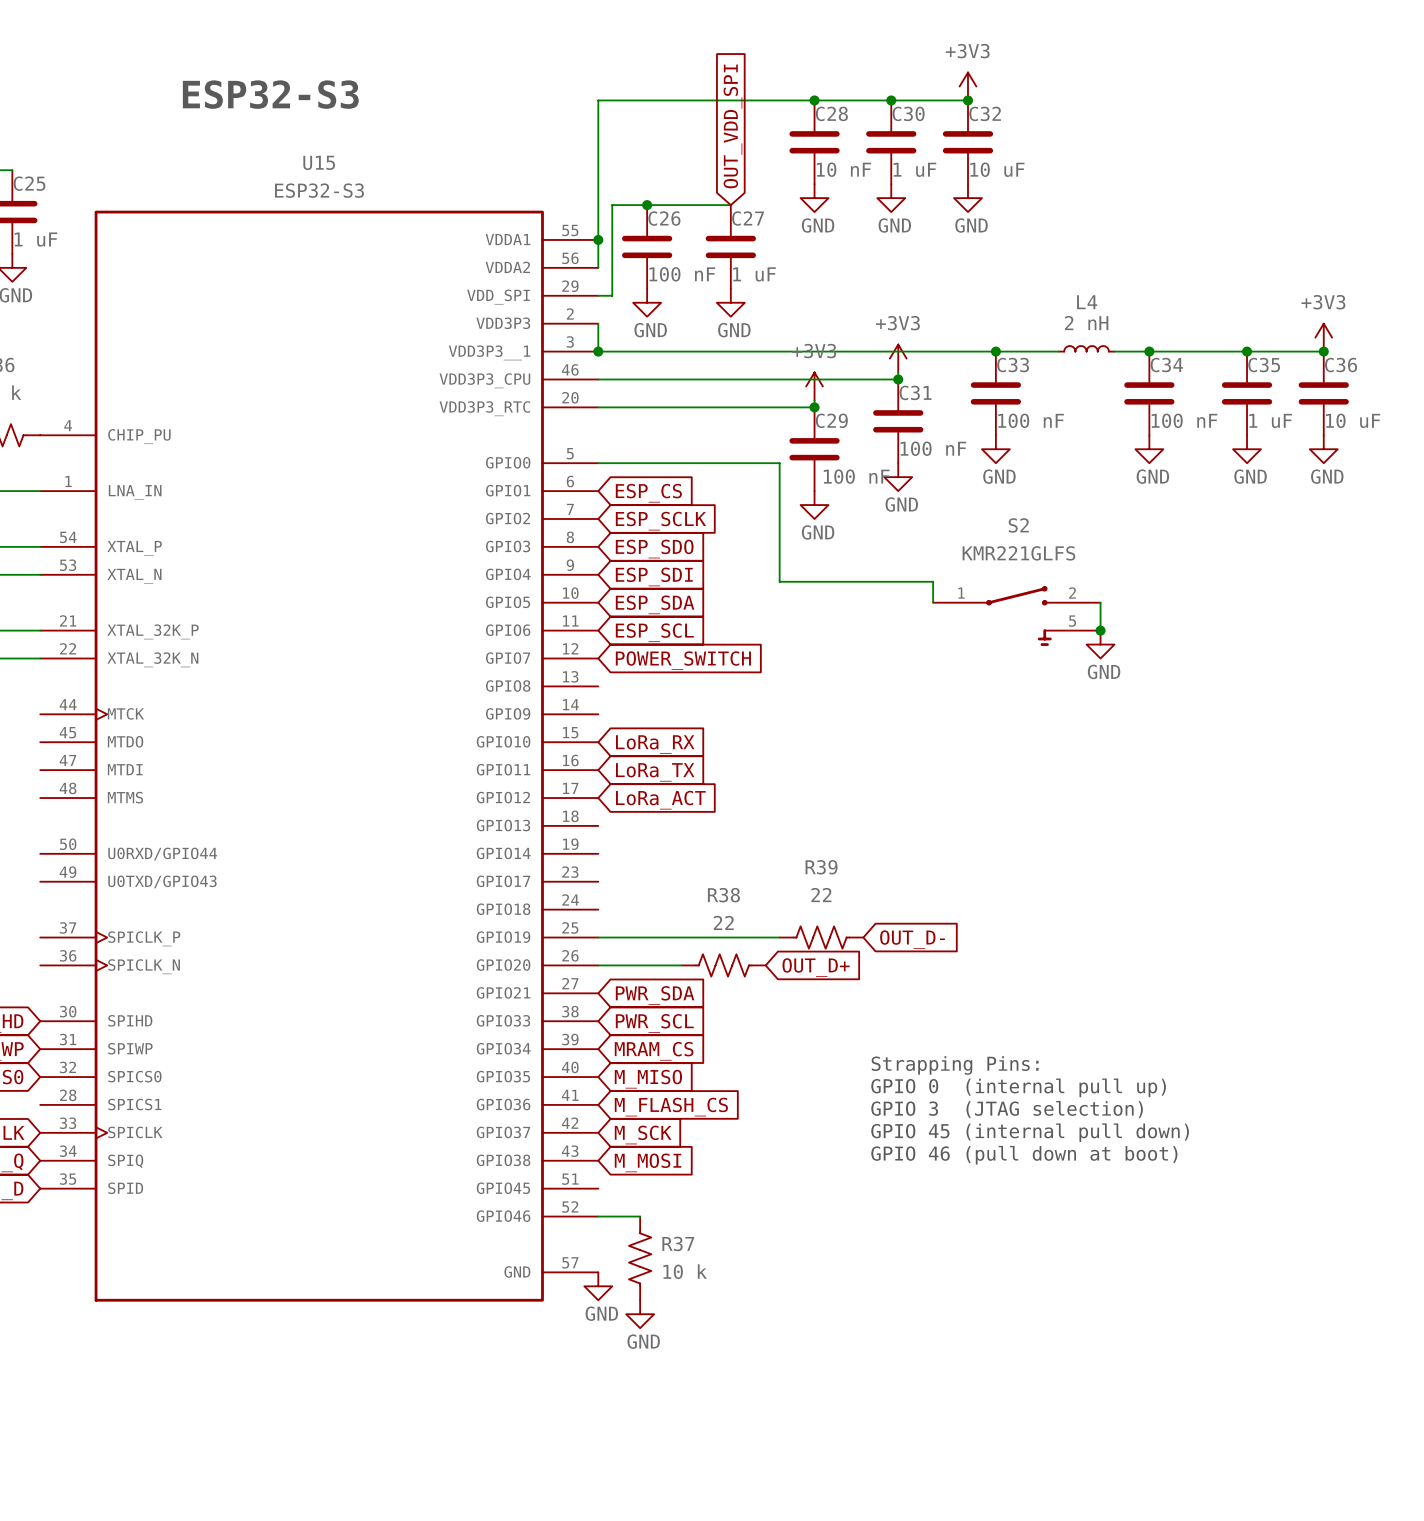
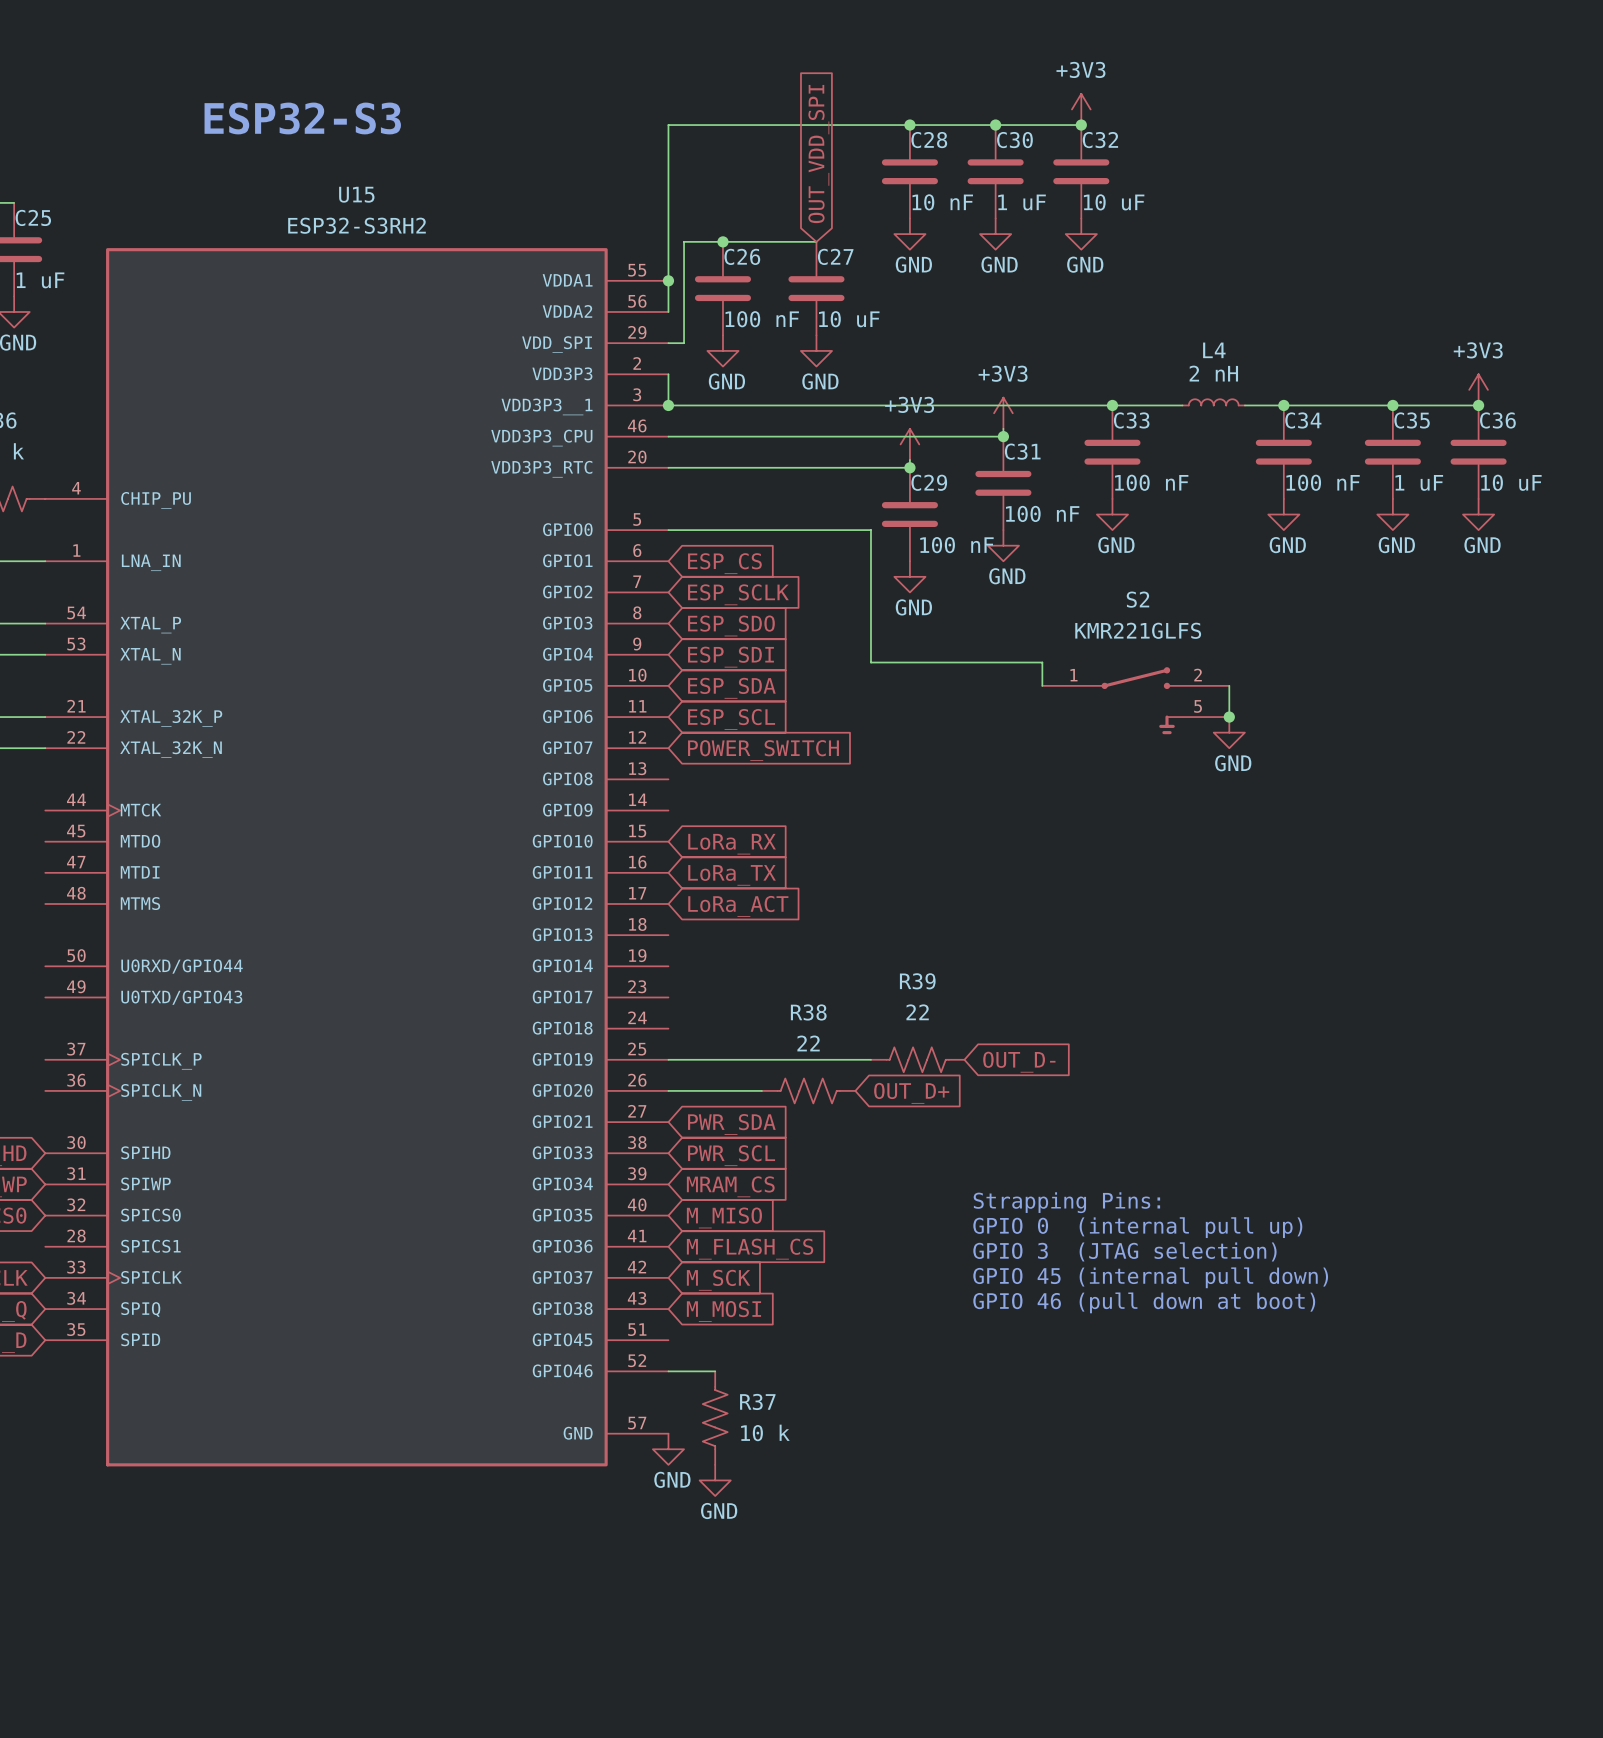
U15 value: ESP32-S3 (319, 190) -> ESP32-S3RH2 (356, 225)
C27 value: 1 uF (754, 274) -> 10 uF (849, 319)

